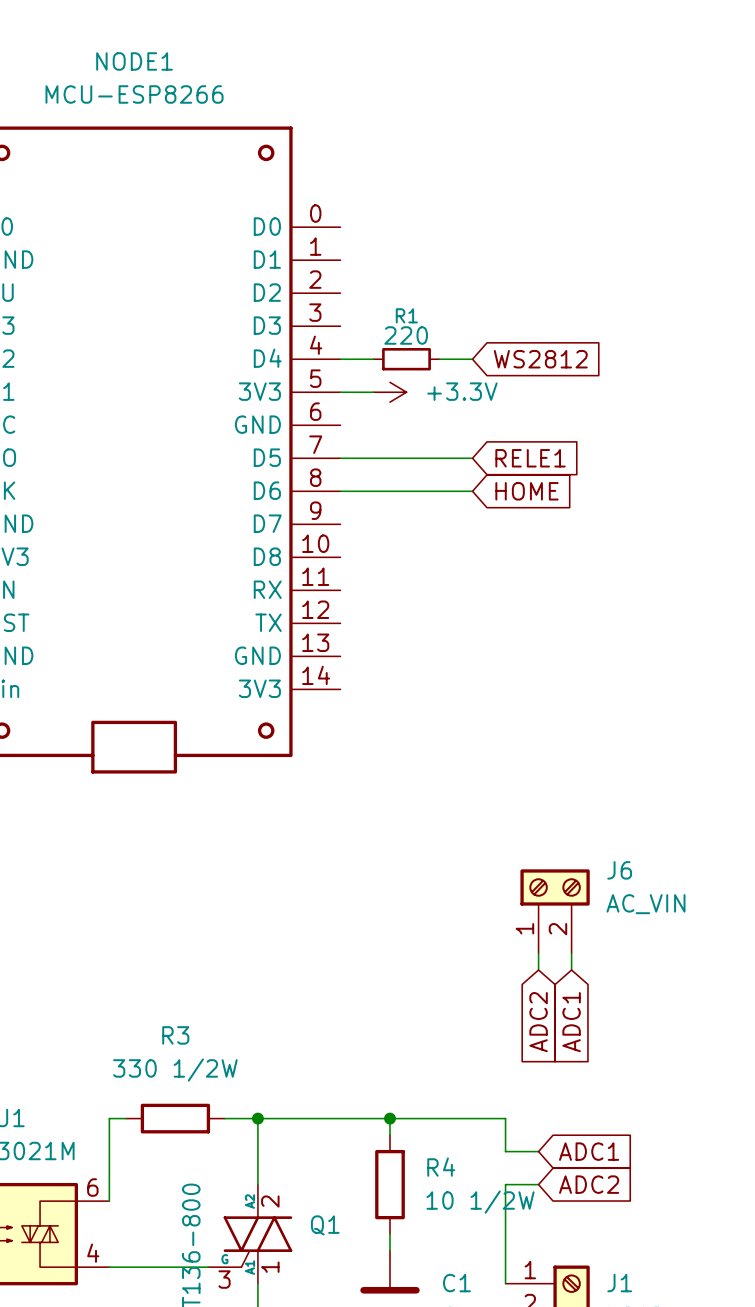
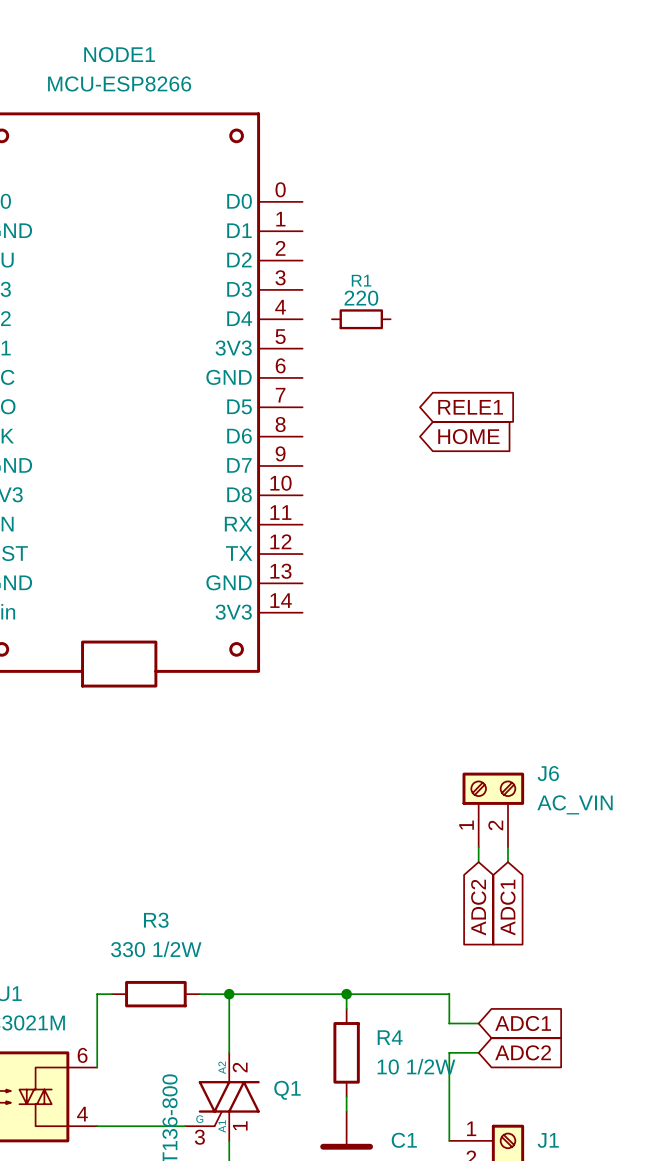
wire: (340, 359) (373, 359) -> none
wire: (439, 359) (472, 359) -> none
global label: WS2812 (540, 359) -> none
wire: (340, 392) (373, 392) -> none
power symbol: +3.3V (390, 392) -> none
wire: (340, 458) (472, 458) -> none
wire: (340, 491) (472, 491) -> none

